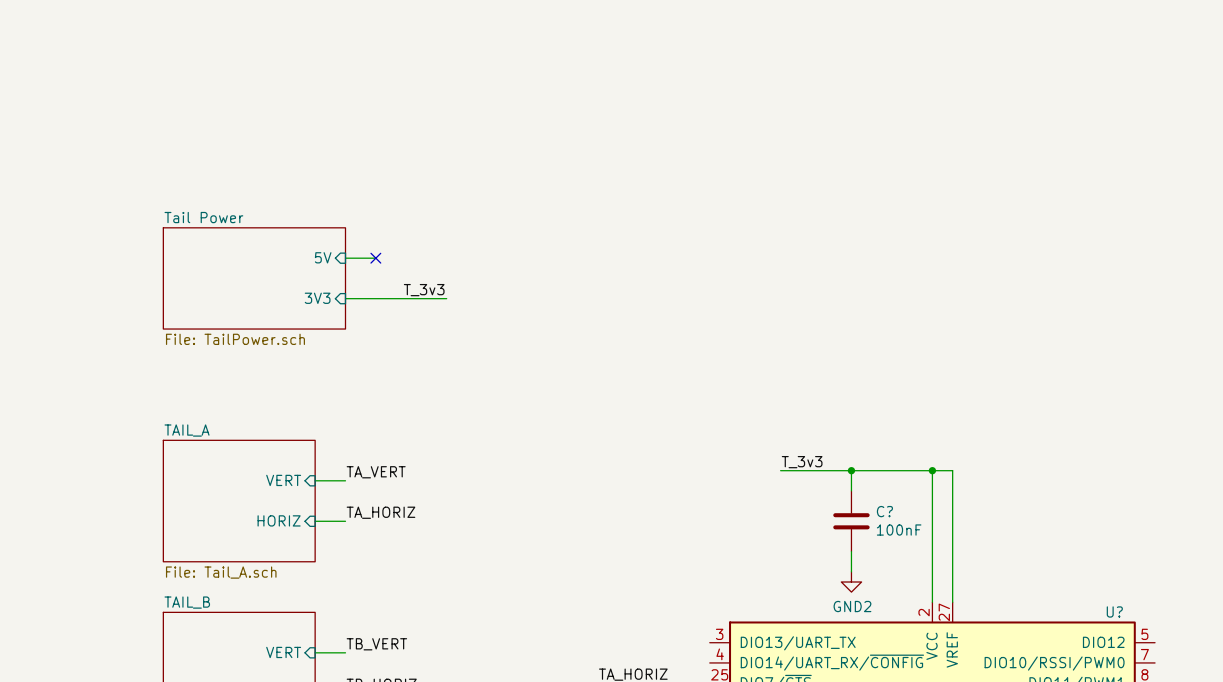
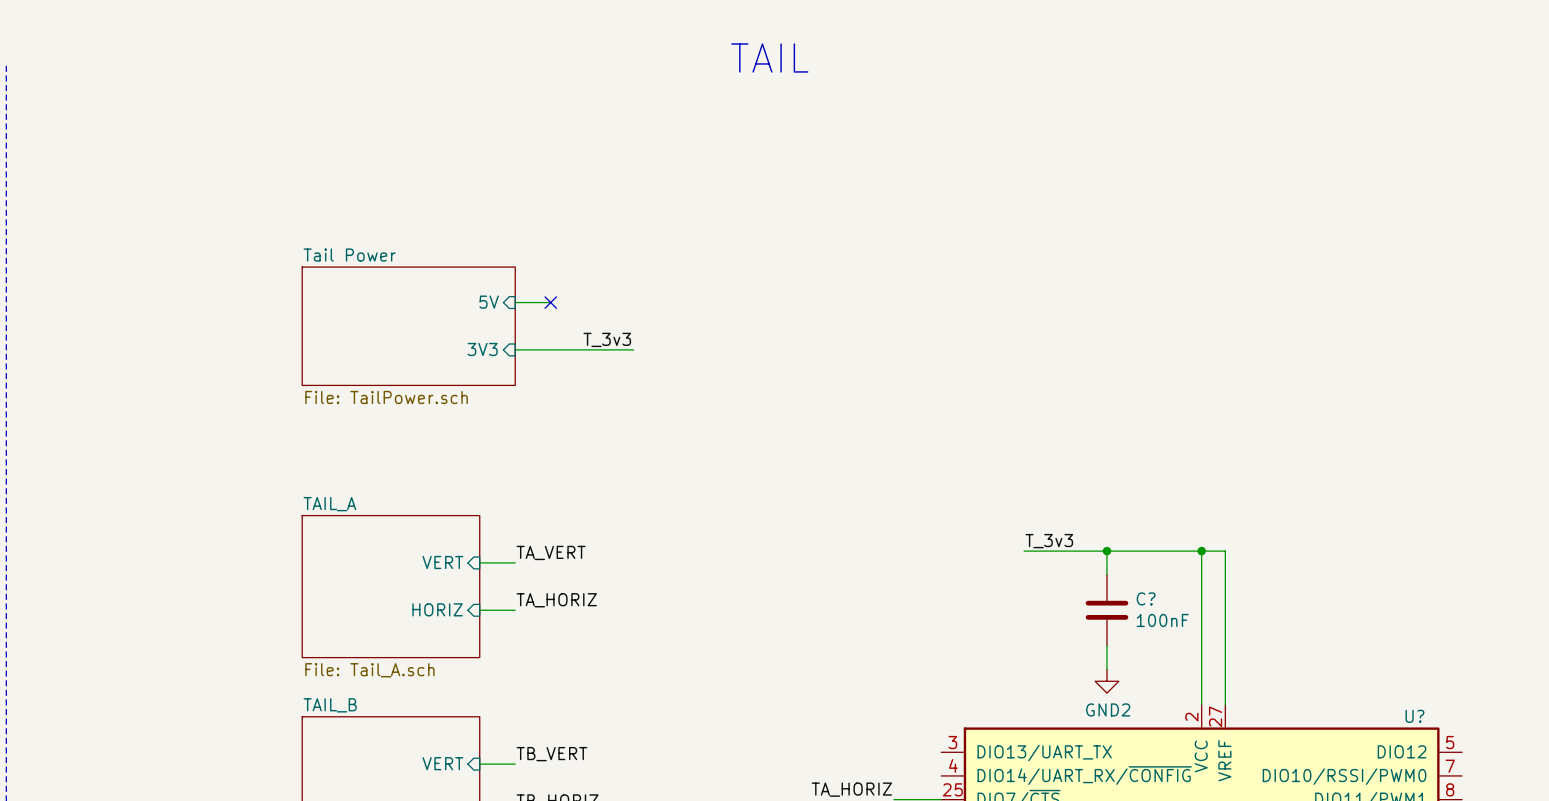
text: none -> TAIL (769, 57)

